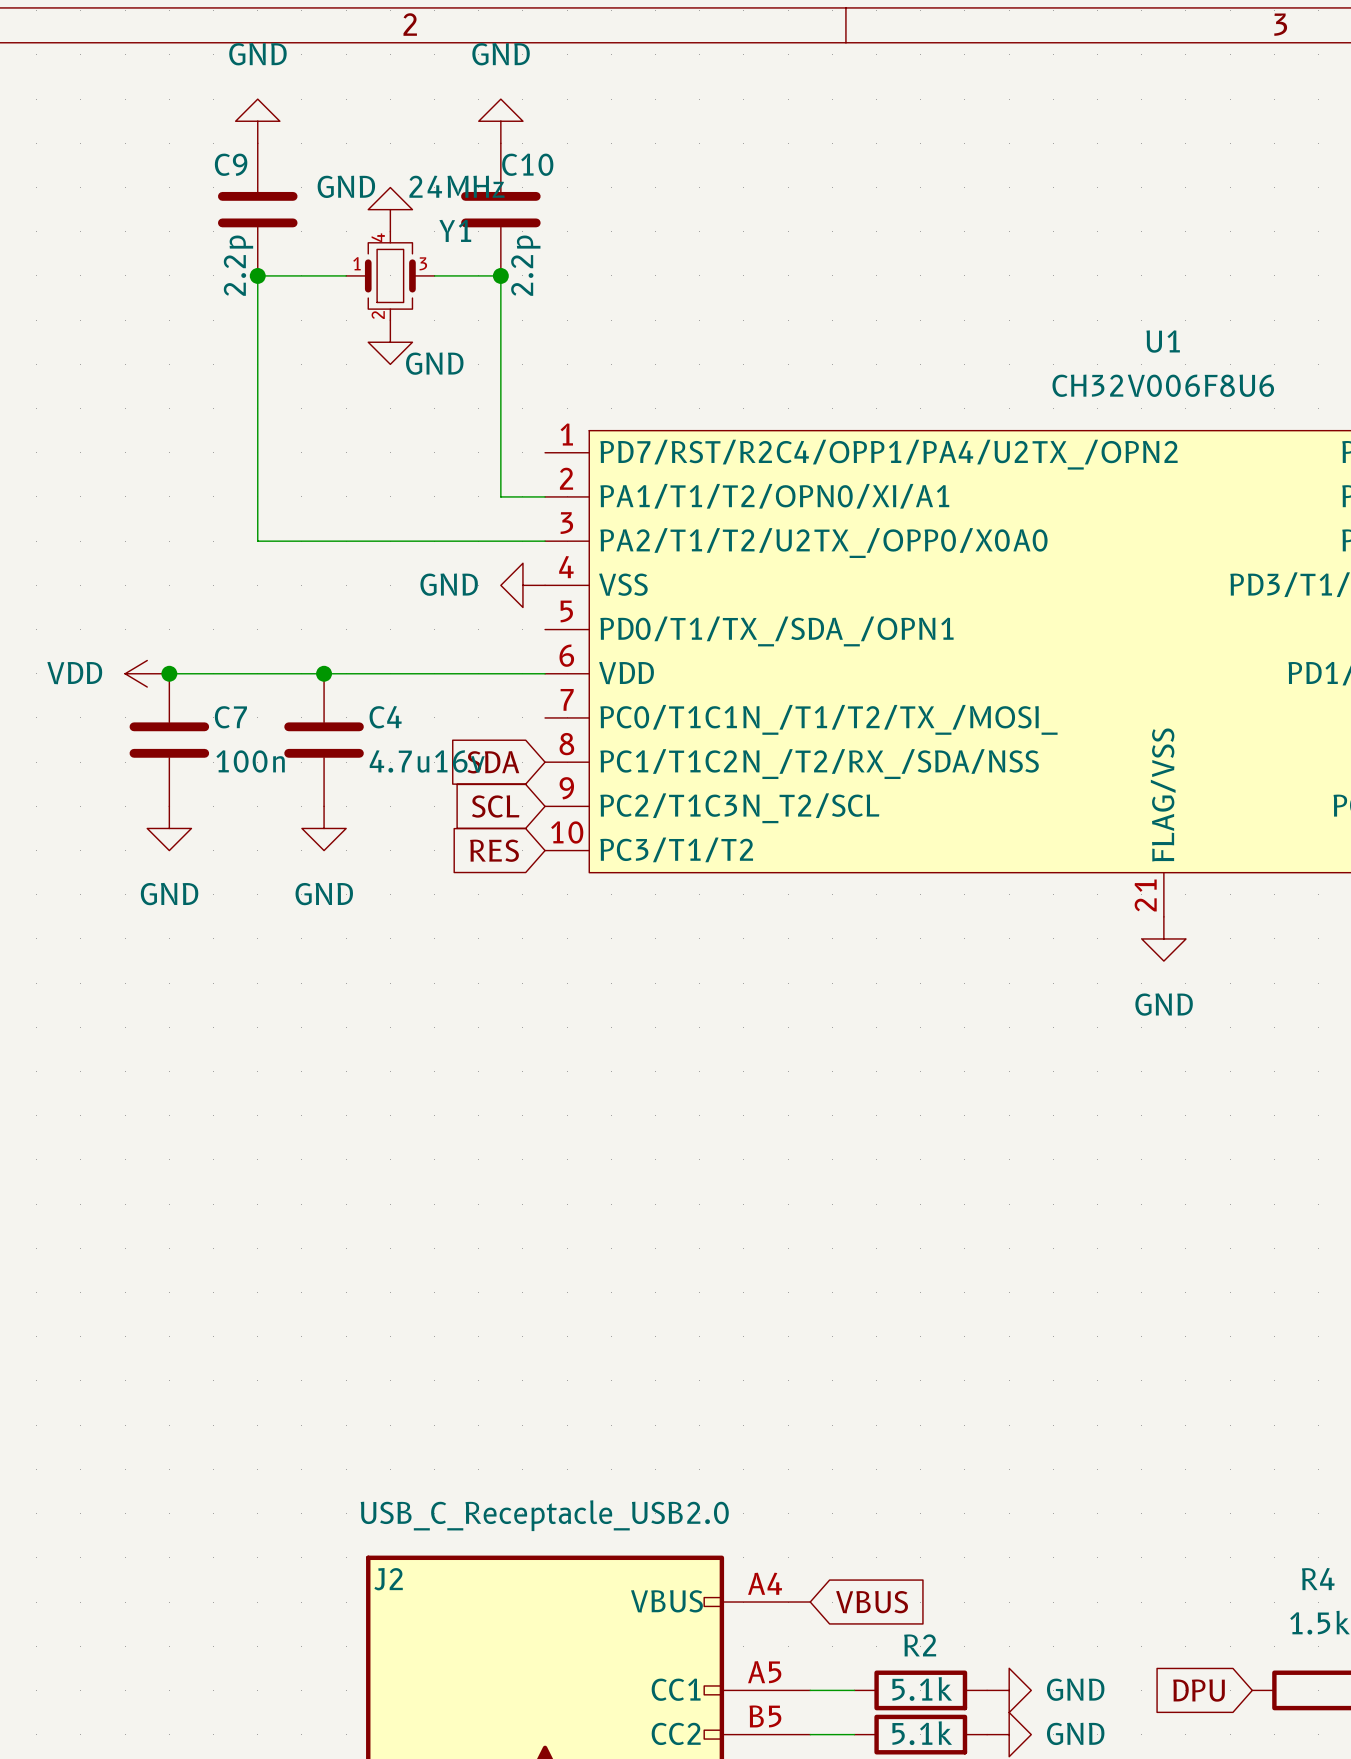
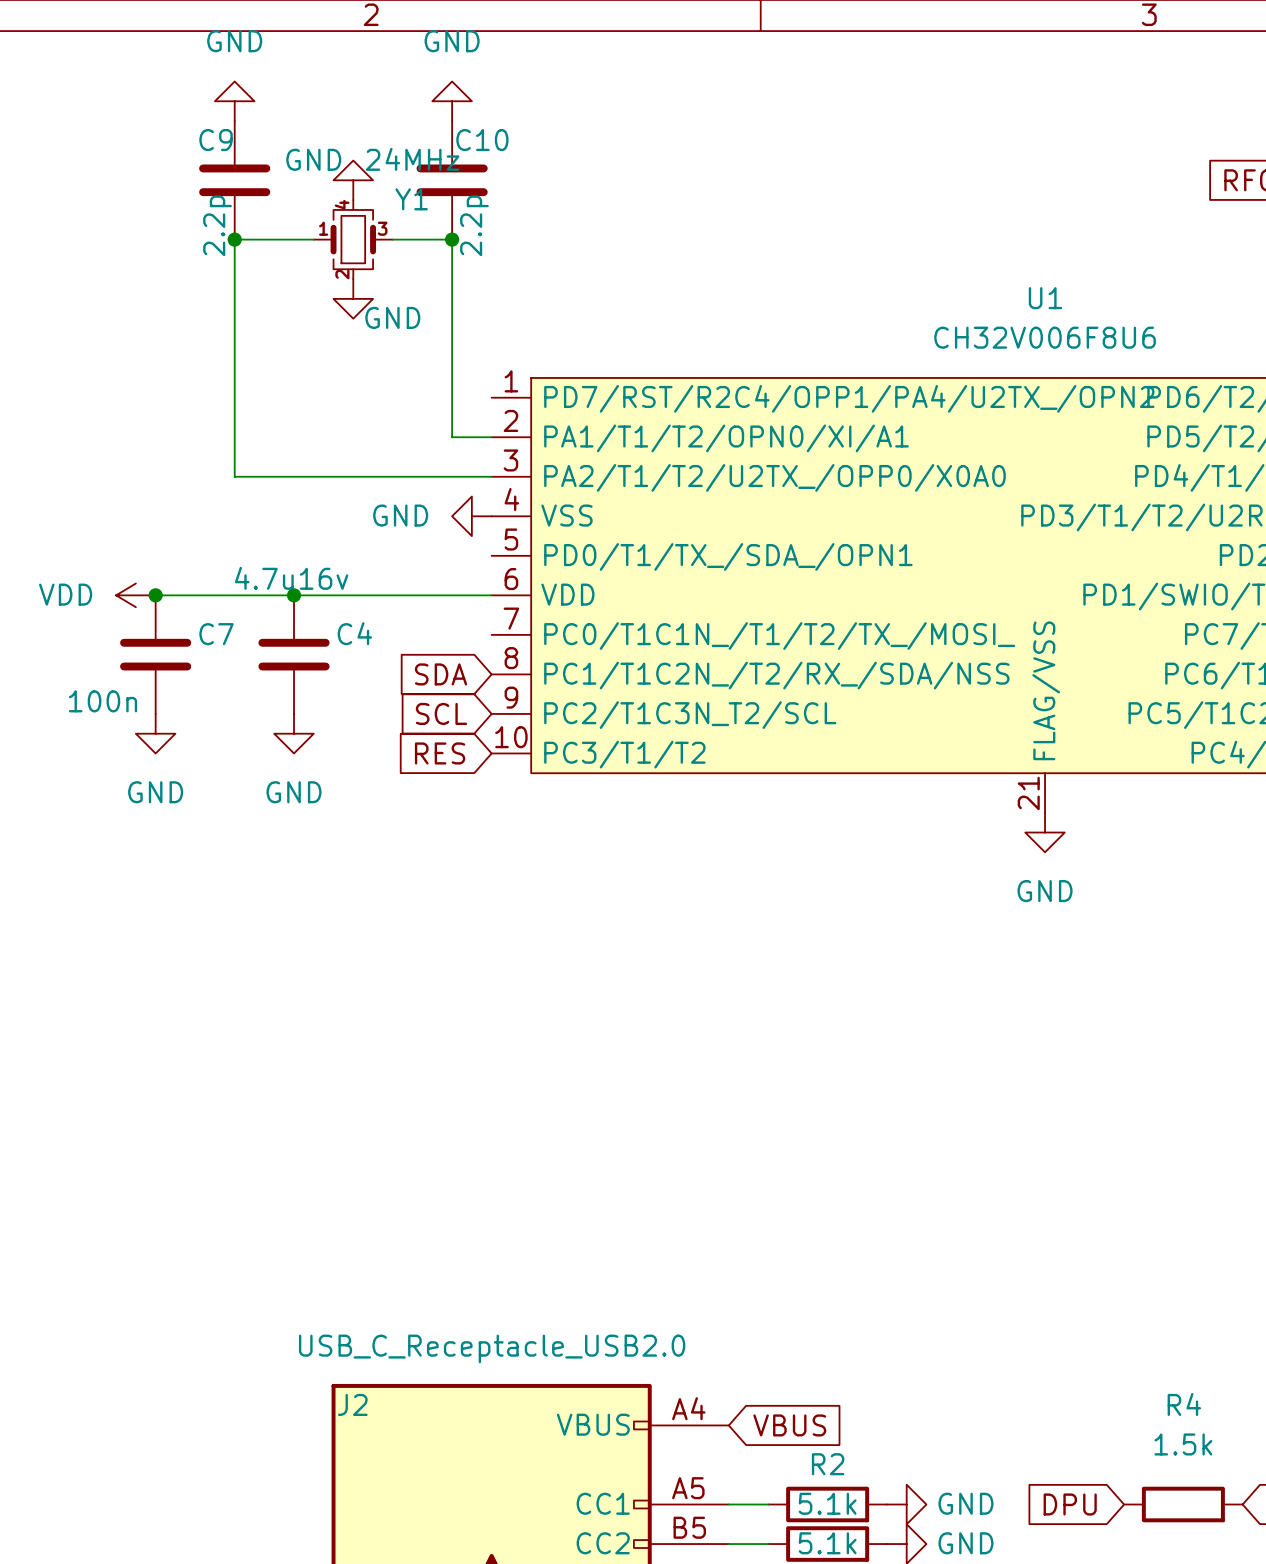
C7 value position: 100n (250, 761) -> 100n (103, 701)
C4 value position: 4.7u16v (427, 761) -> 4.7u16v (291, 578)

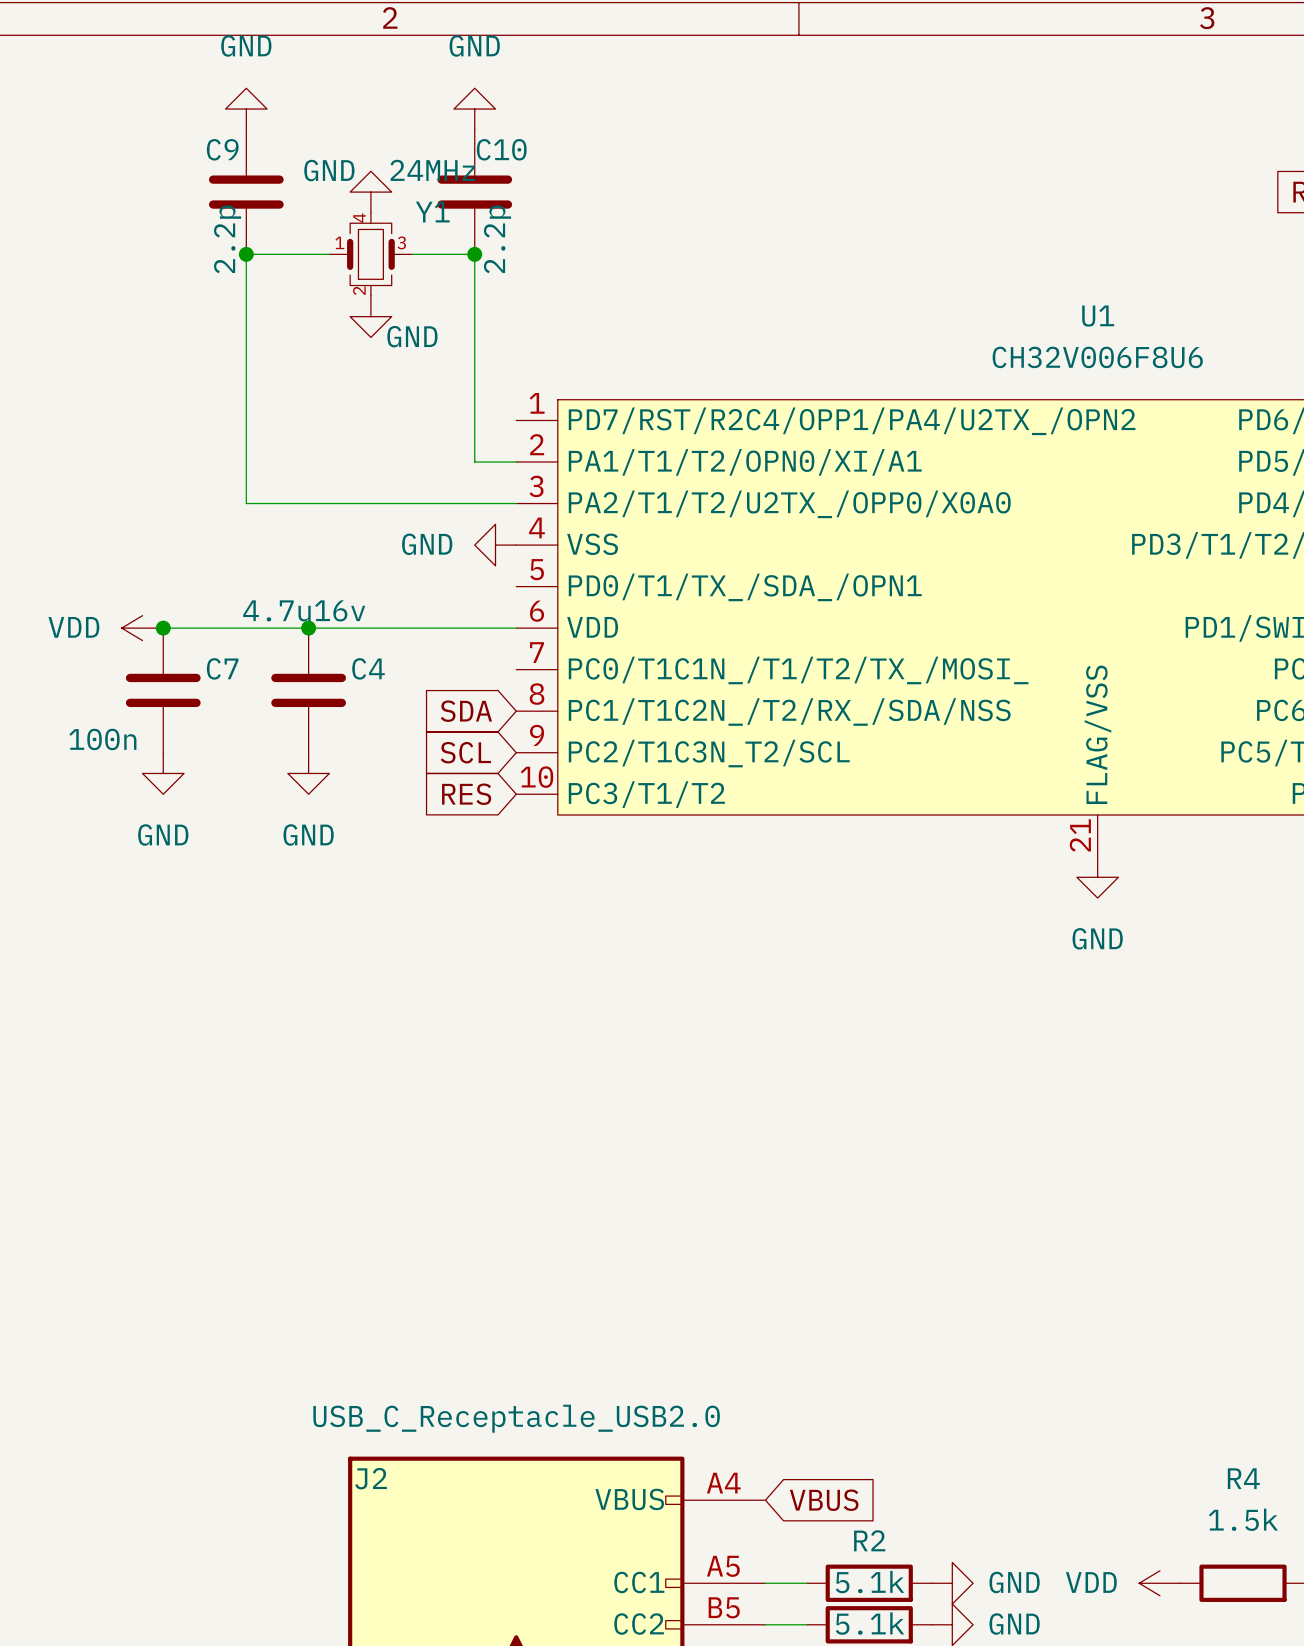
global label: DPU (1070, 1504) -> none
power symbol: none -> VDD (1159, 1583)

